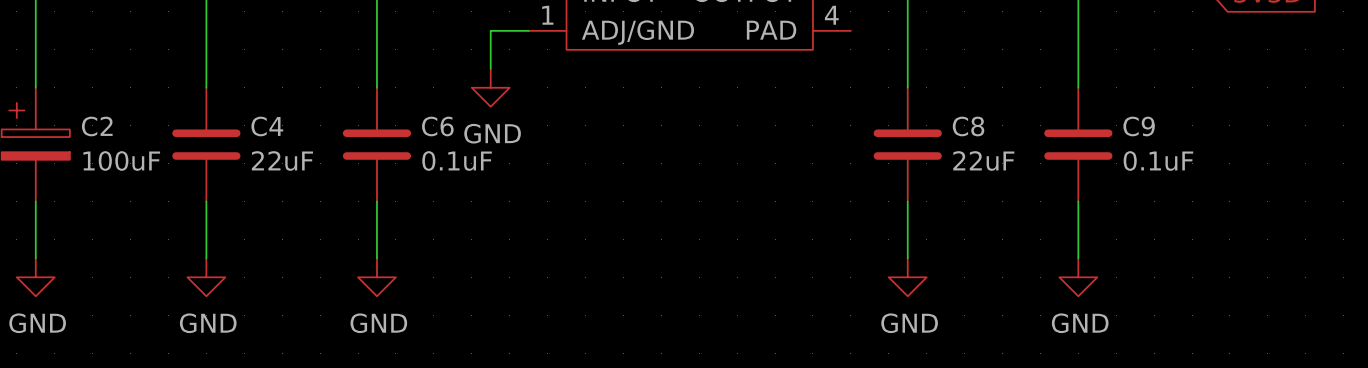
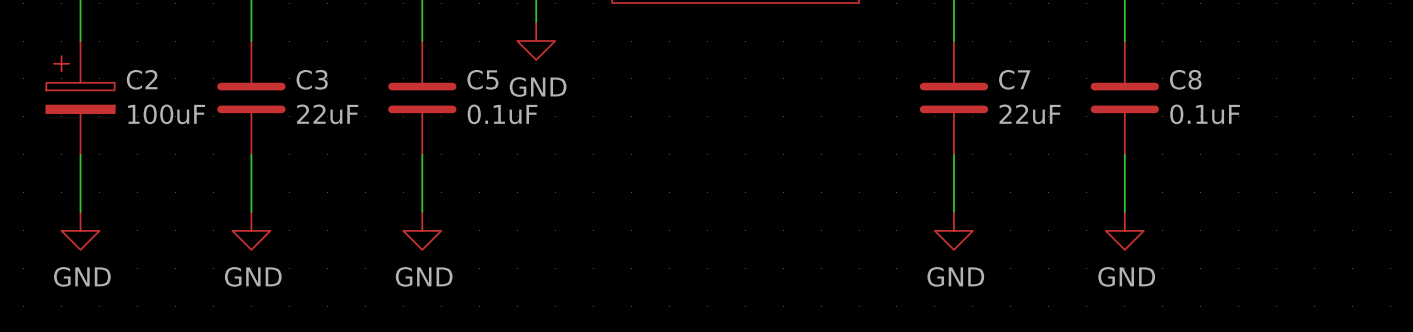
C4 name: C4 (267, 126) -> C3 (312, 79)
C6 name: C6 (437, 126) -> C5 (482, 79)
C8 name: C8 (968, 126) -> C7 (1014, 79)
C9 name: C9 (1139, 126) -> C8 (1185, 79)

